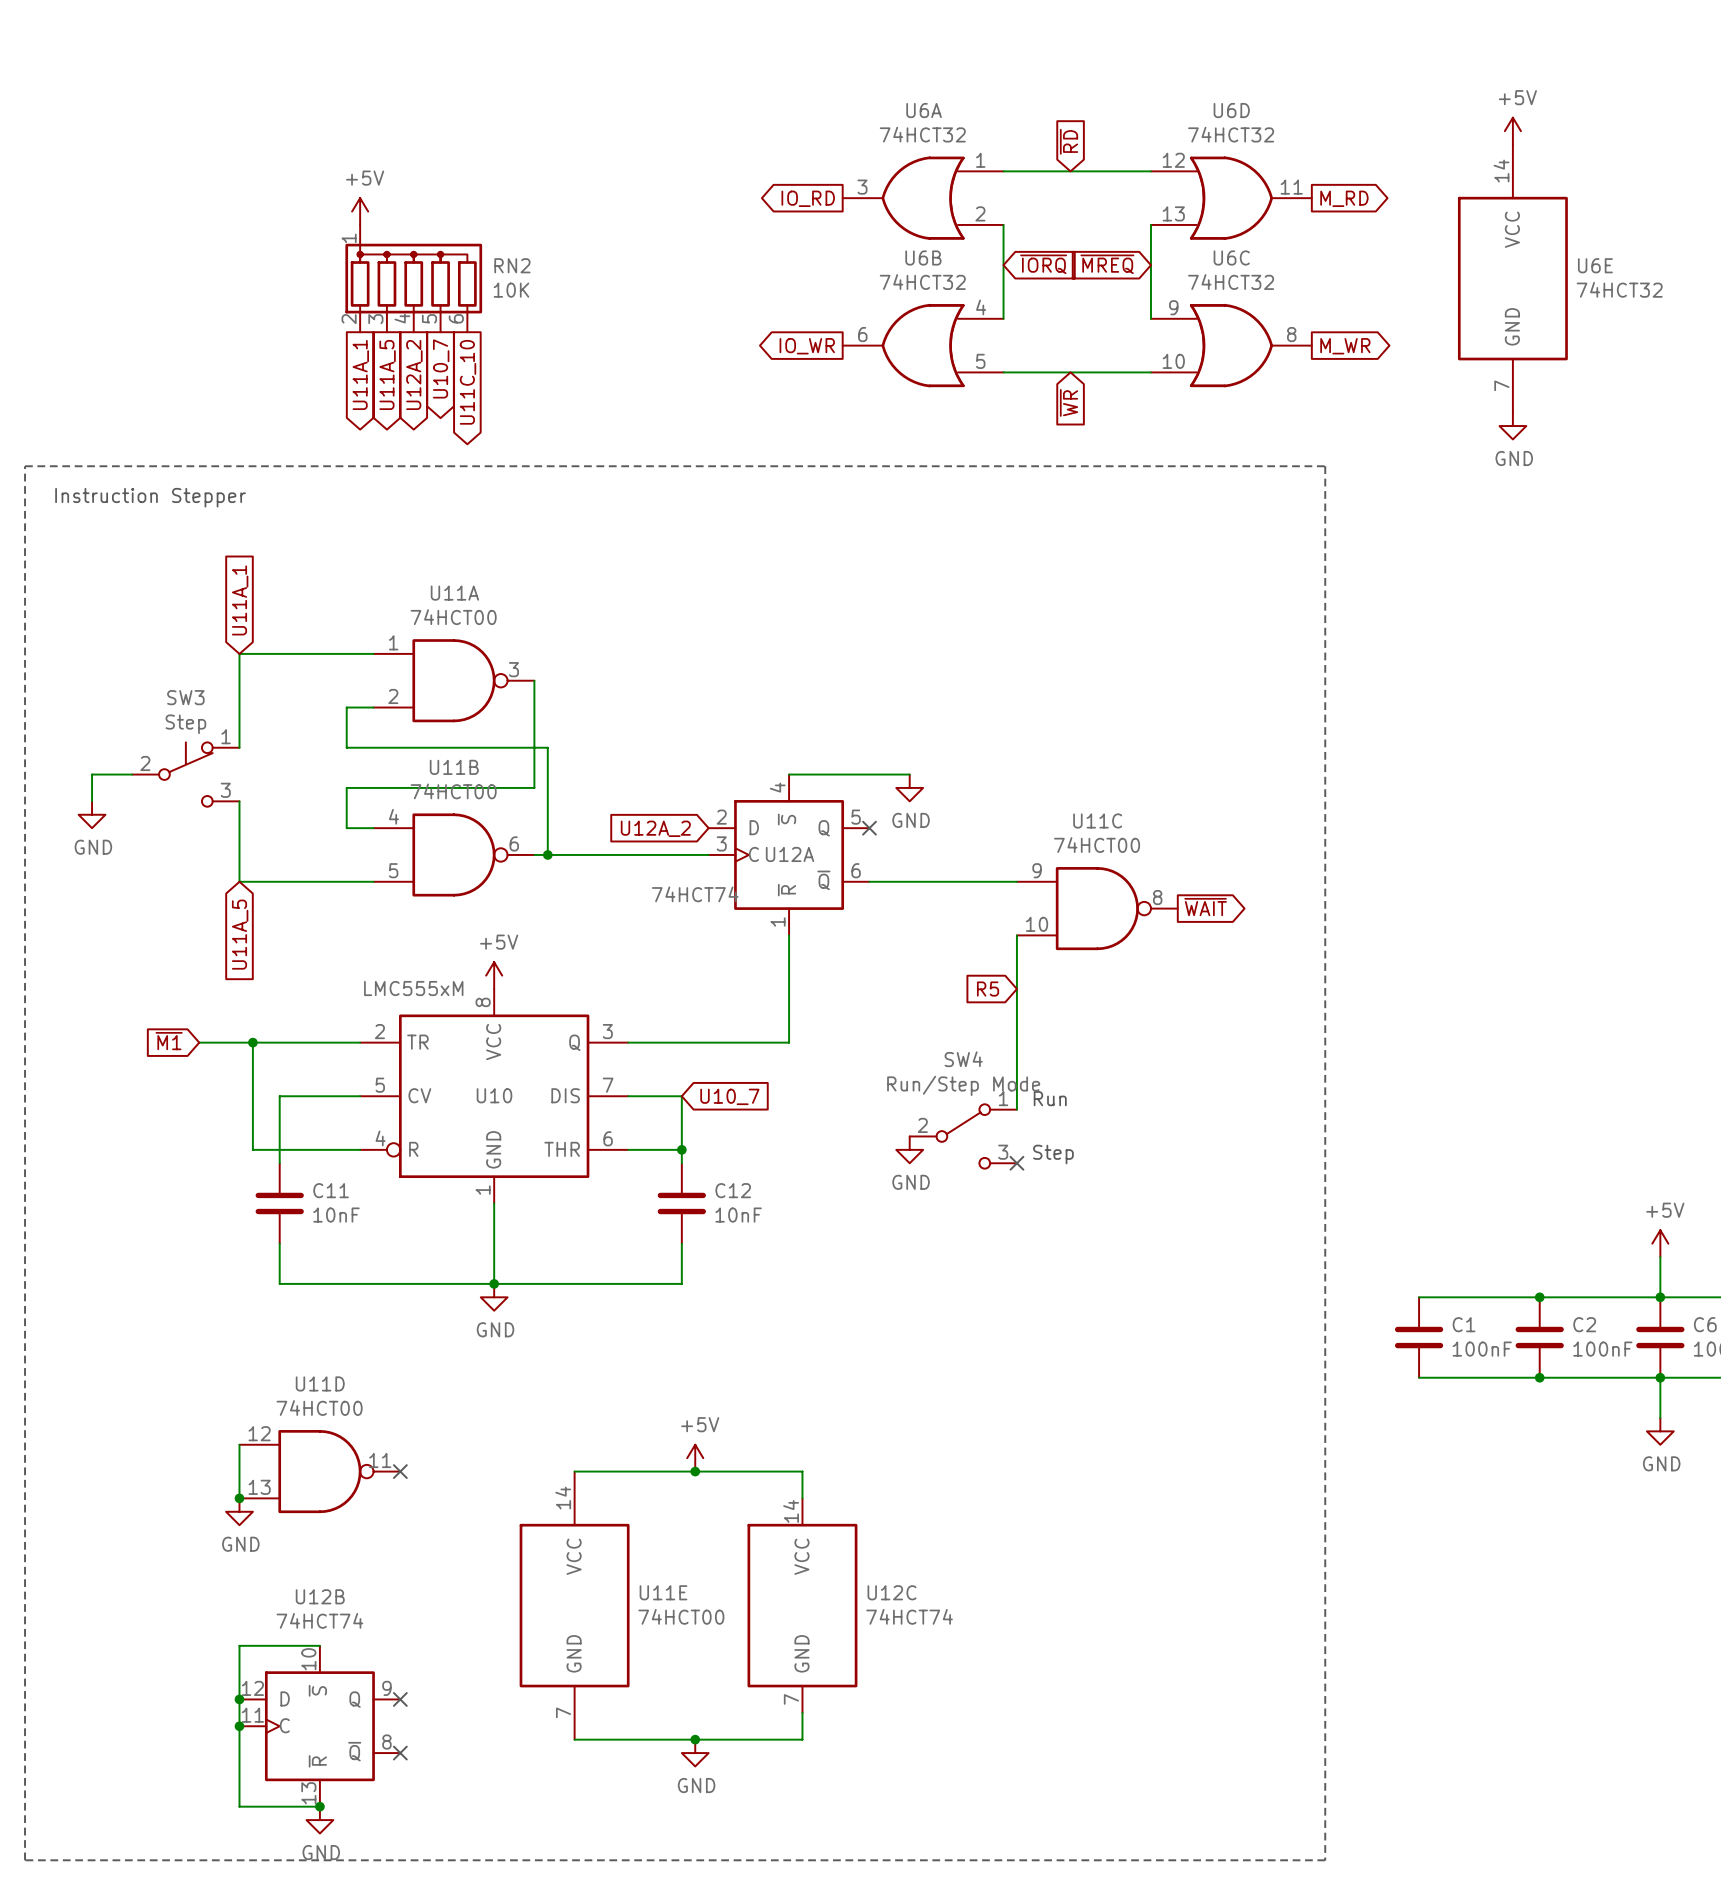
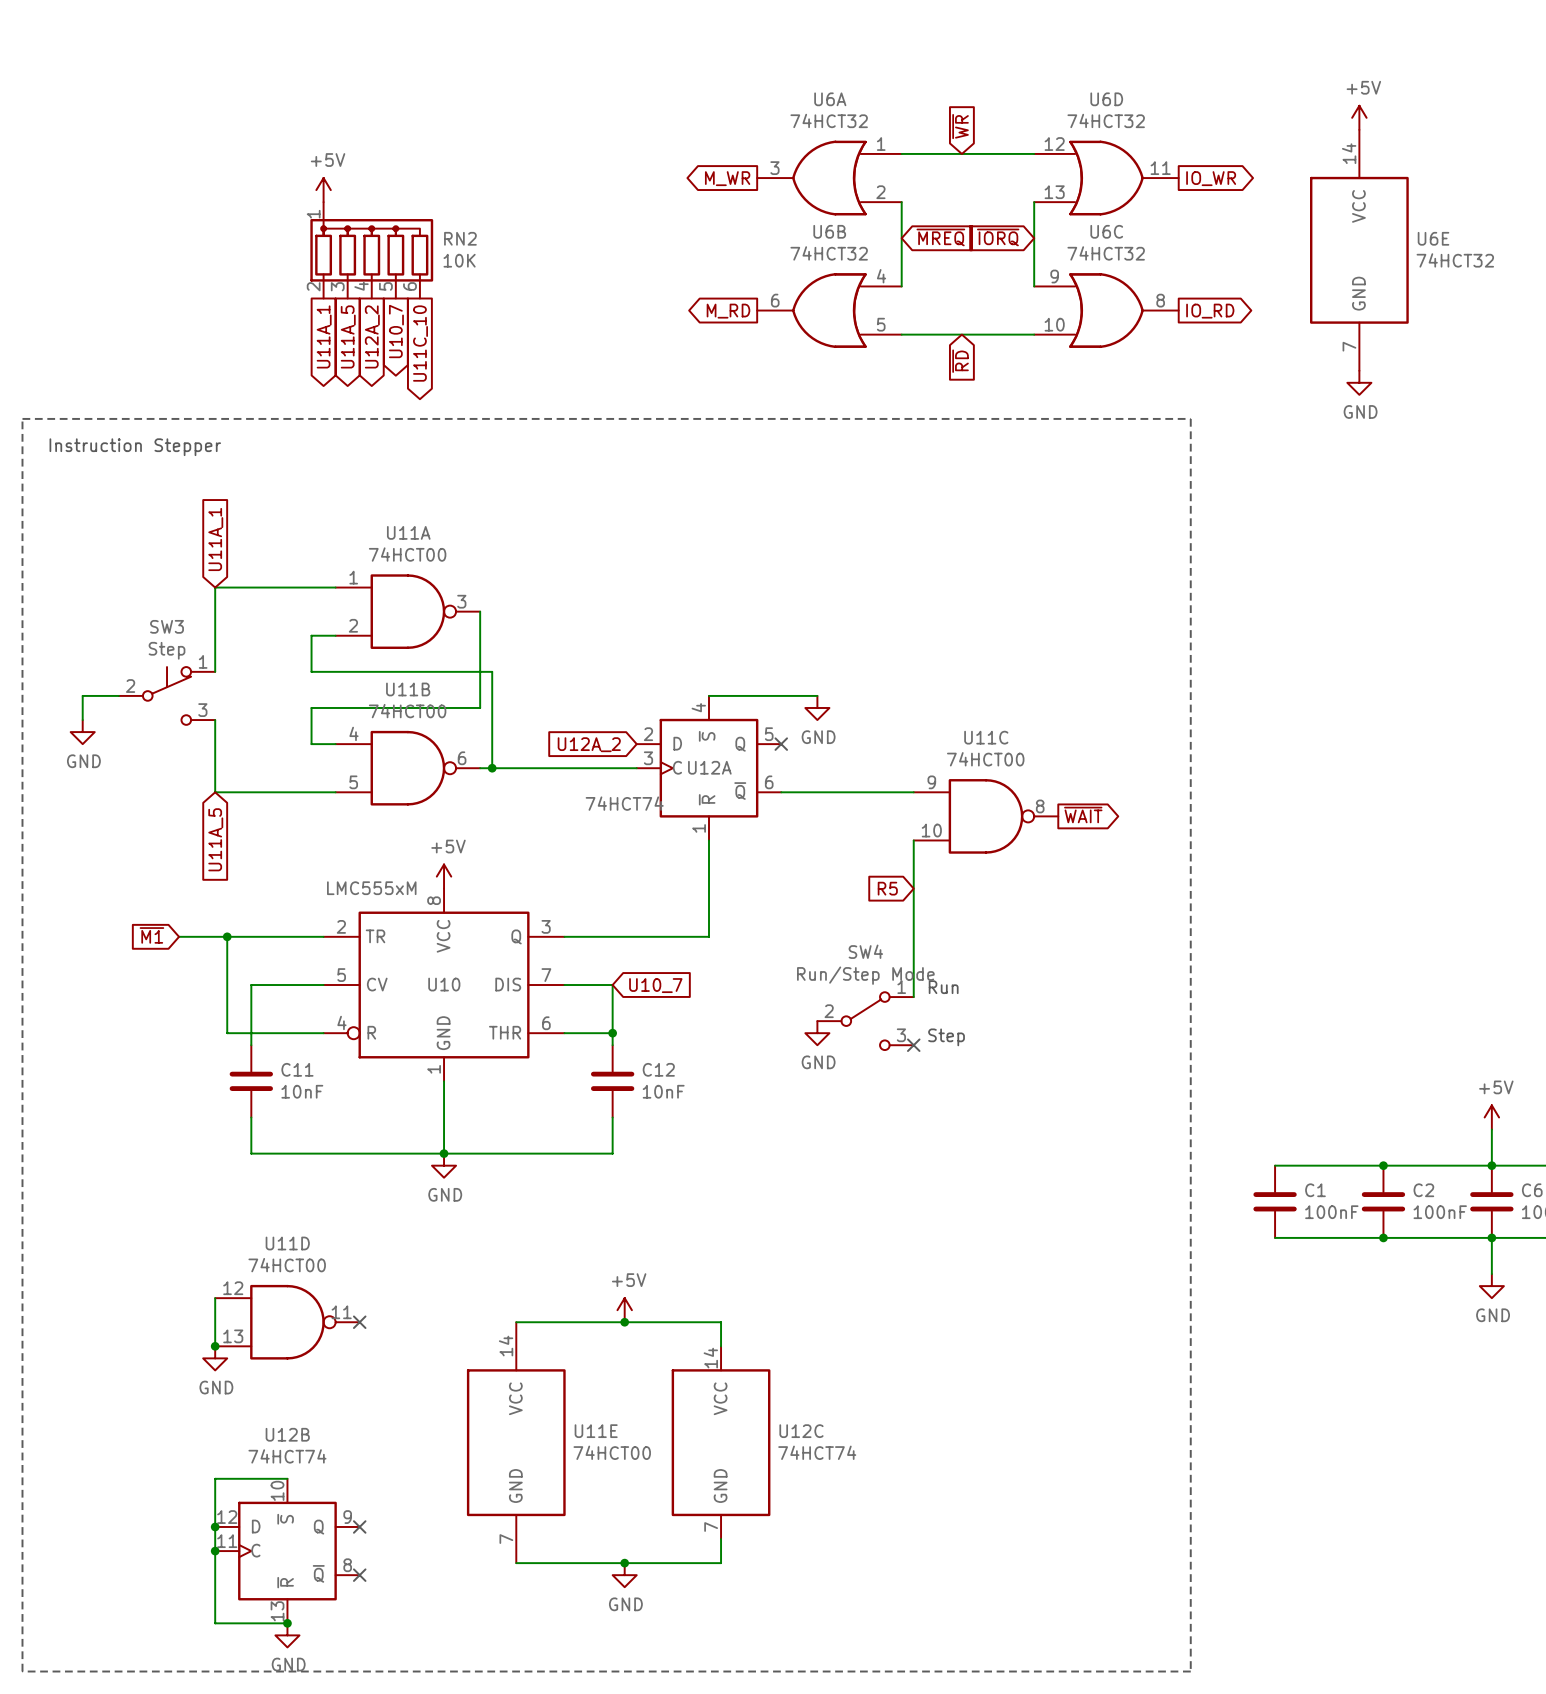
global label: ~{RD} (1069, 141) -> ~{WR} (960, 126)
global label: IO_RD (808, 198) -> M_WR (727, 178)
global label: M_RD (1344, 198) -> IO_WR (1211, 178)
global label: ~{IORQ} (1043, 264) -> ~{MREQ} (940, 237)
global label: ~{MREQ} (1107, 264) -> ~{IORQ} (998, 237)
global label: IO_WR (807, 346) -> M_RD (728, 311)
global label: M_WR (1345, 346) -> IO_RD (1210, 311)
global label: ~{WR} (1069, 402) -> ~{RD} (960, 361)

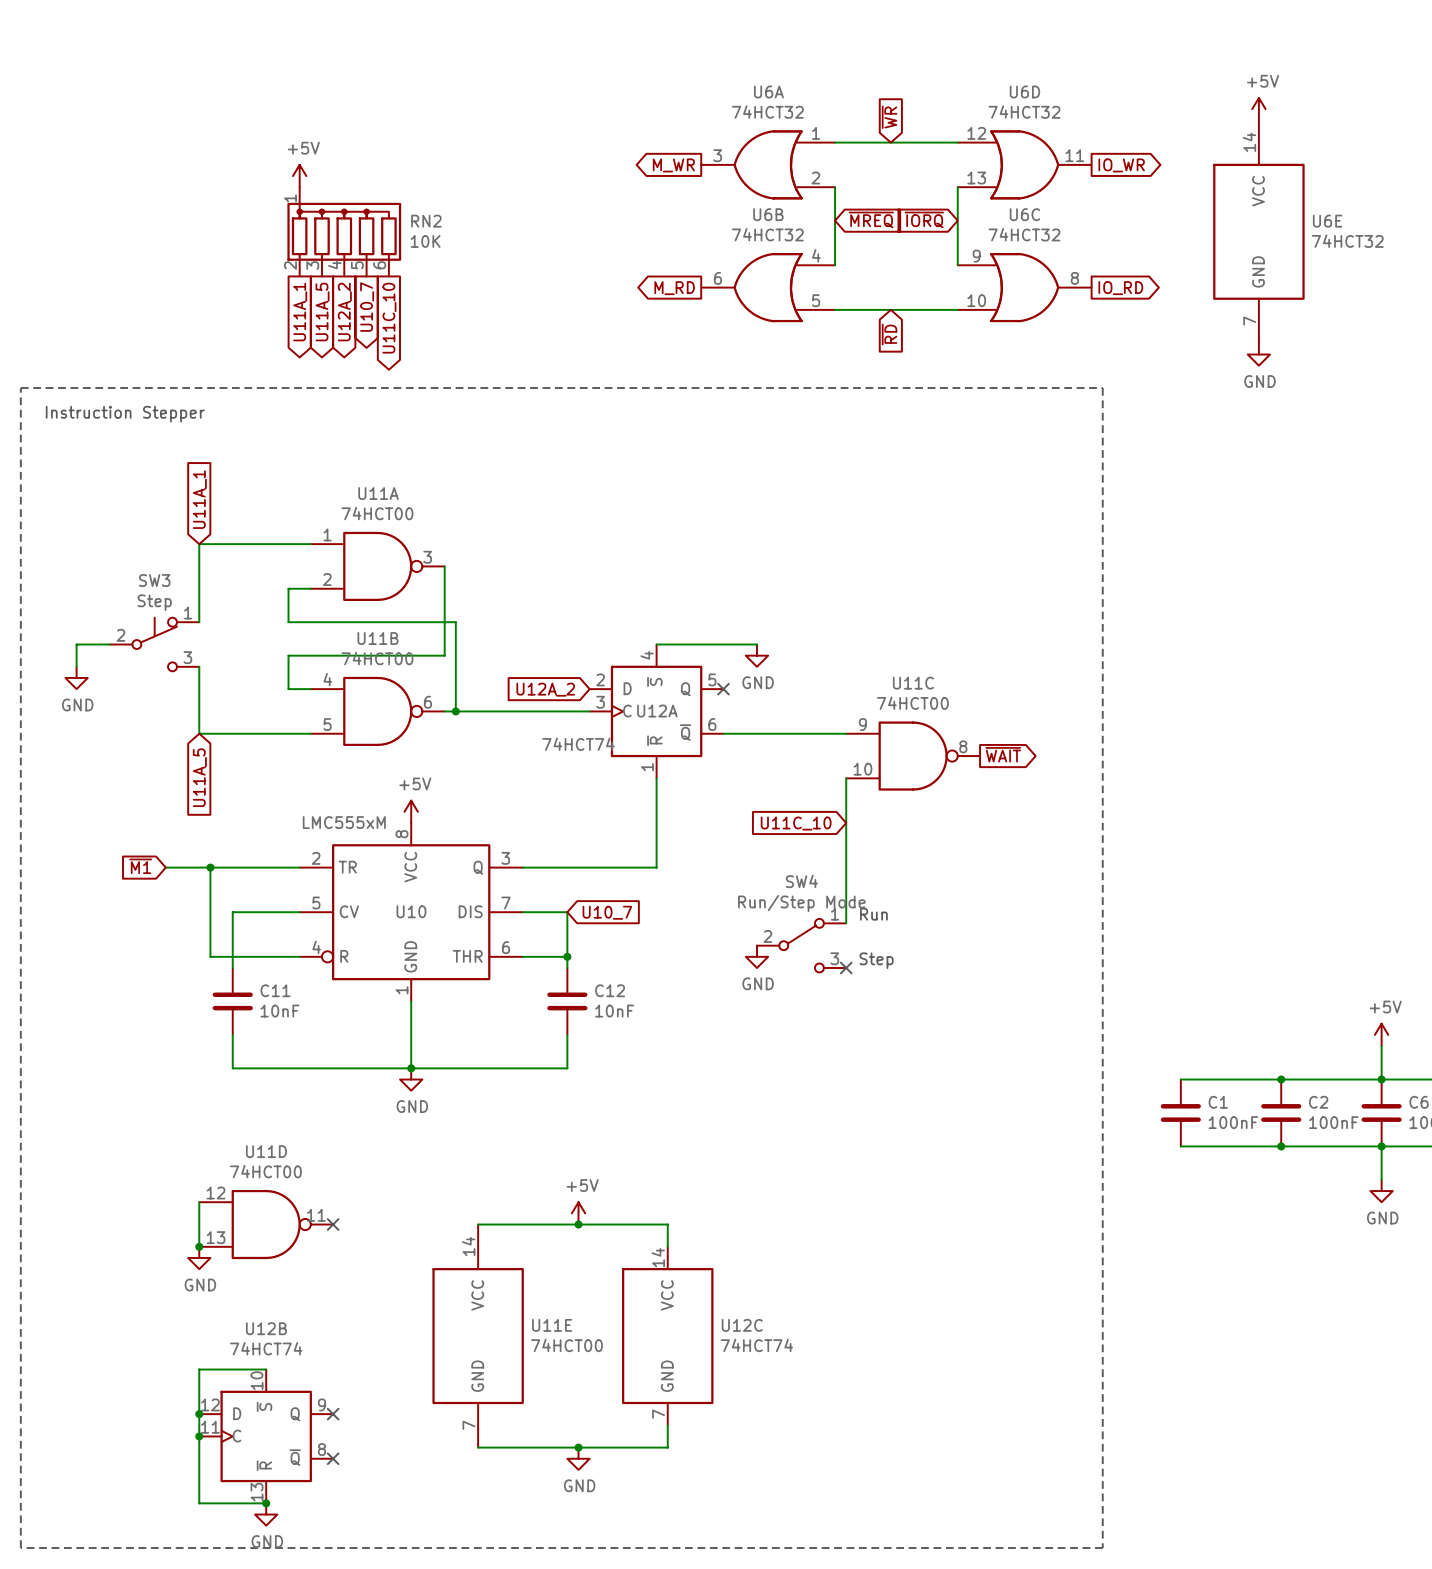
global label: R5 (887, 888) -> U11C_10 (796, 823)

